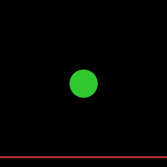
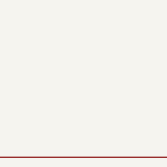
junction: (83, 83) -> none

